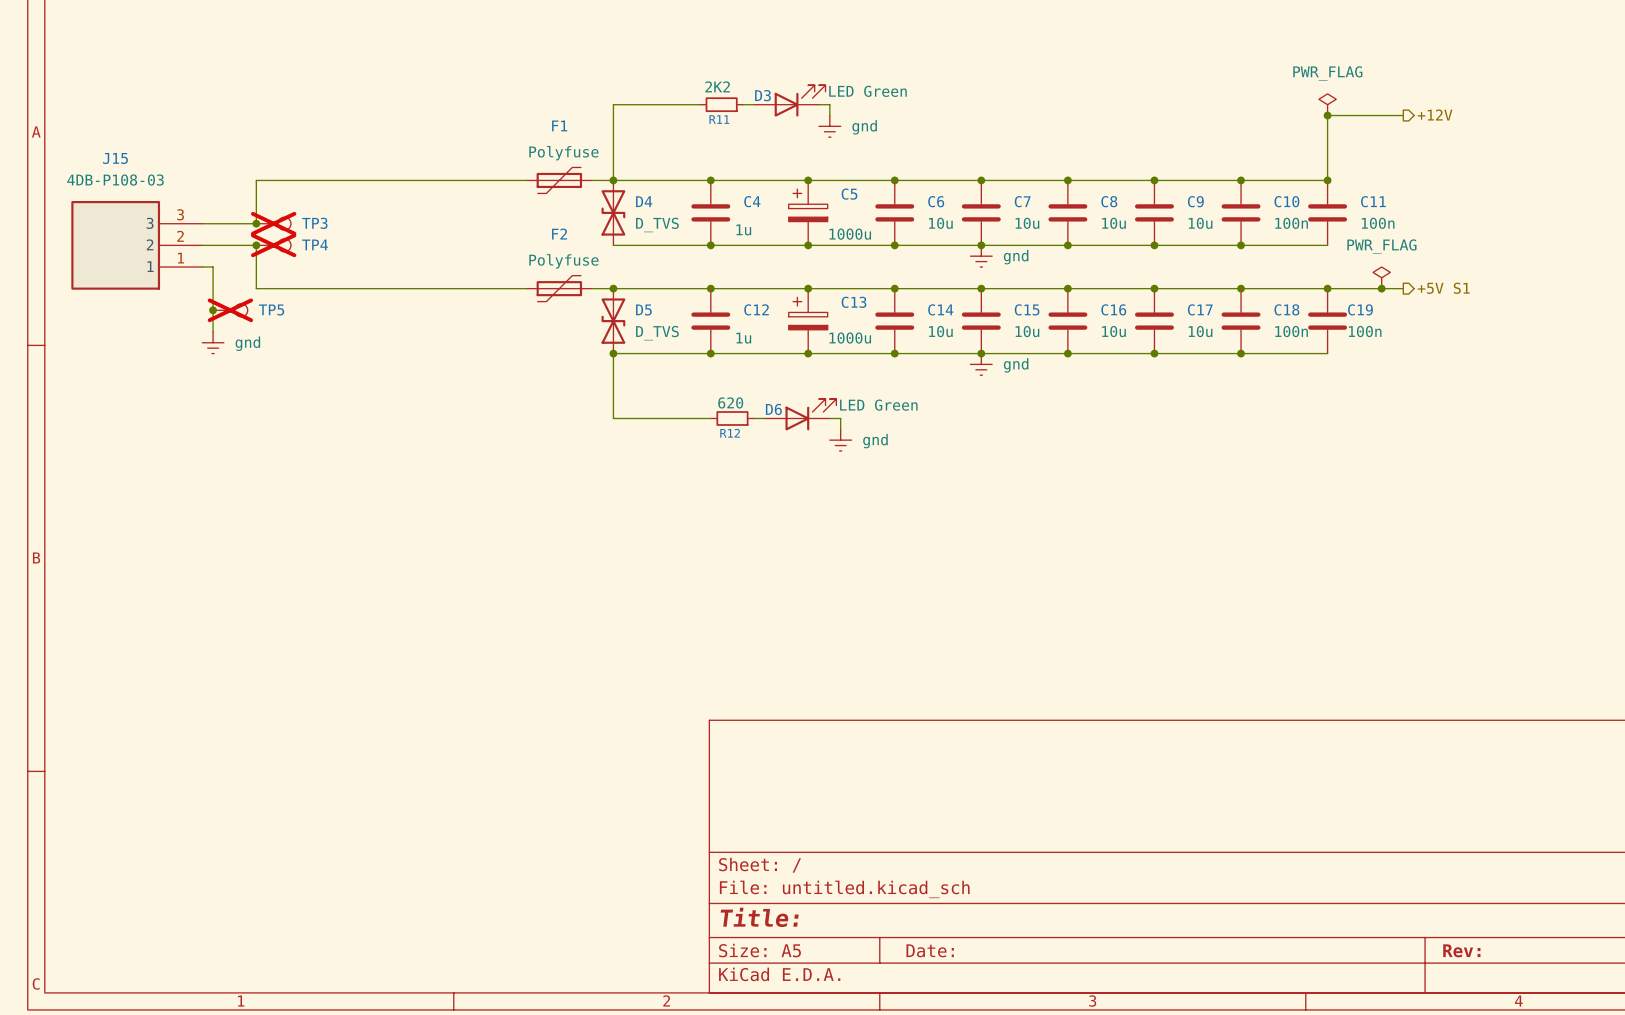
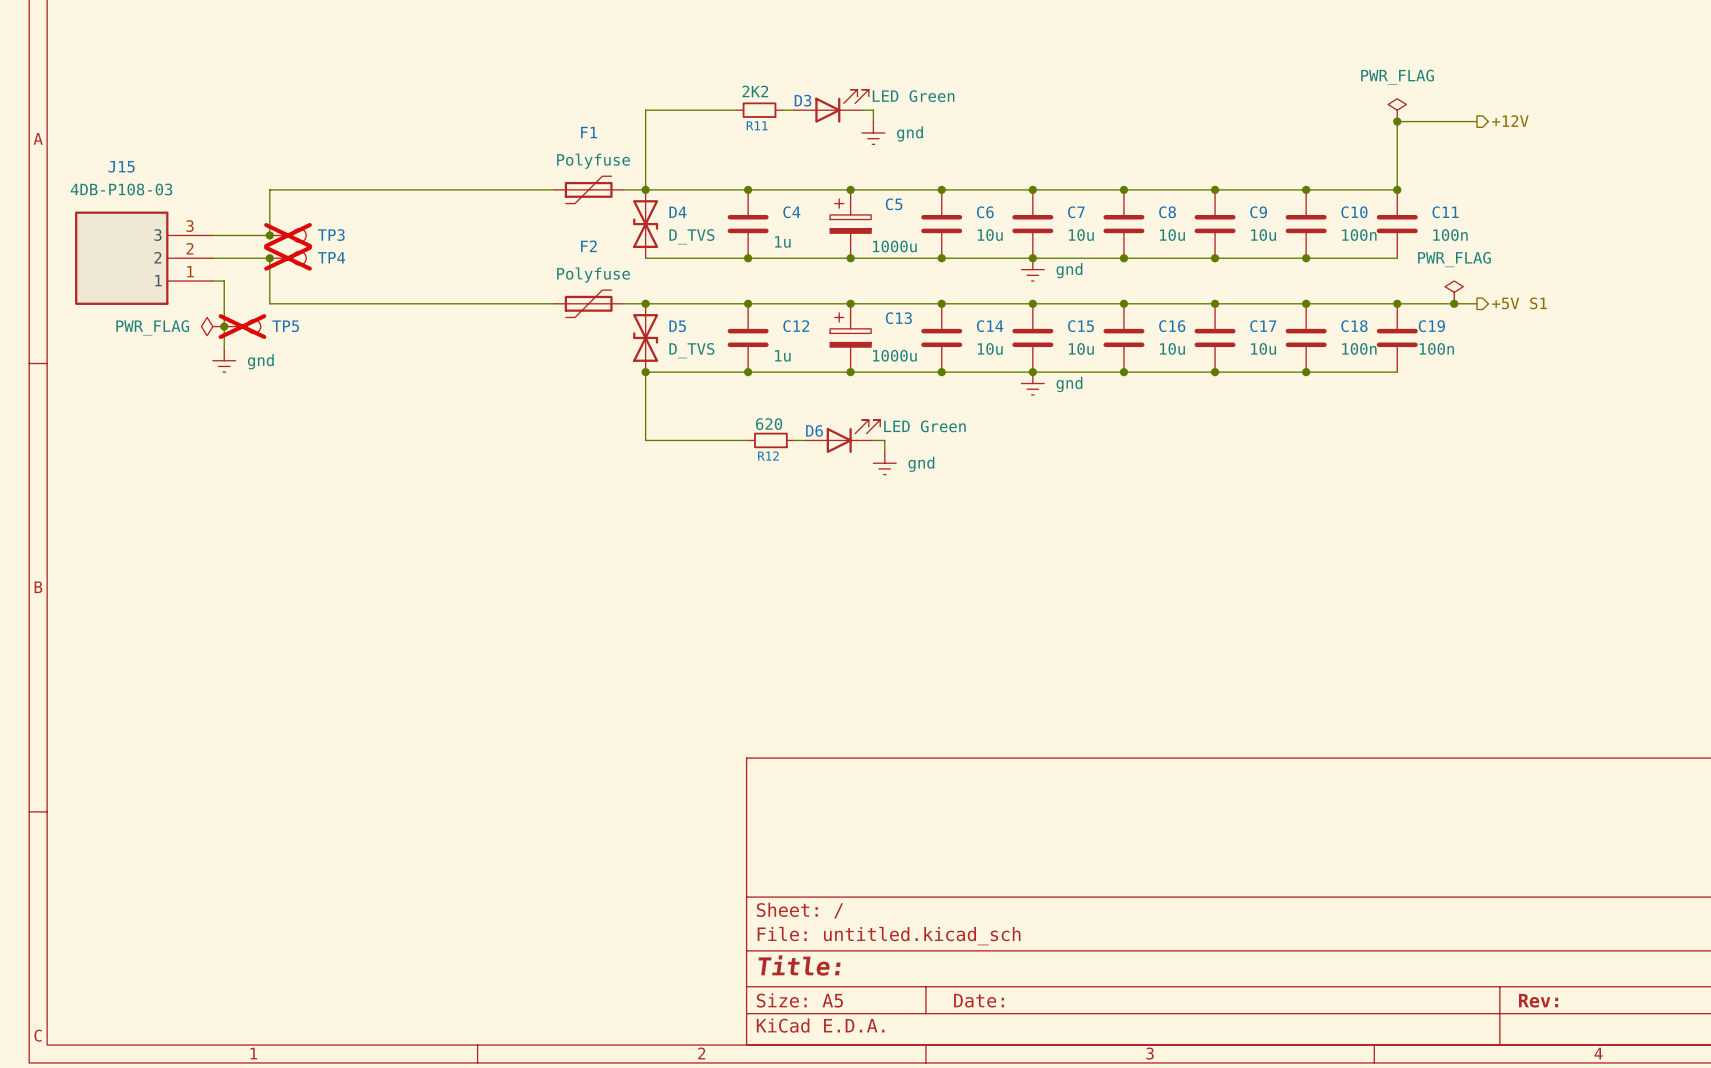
power symbol: none -> PWR_FLAG (212, 326)

